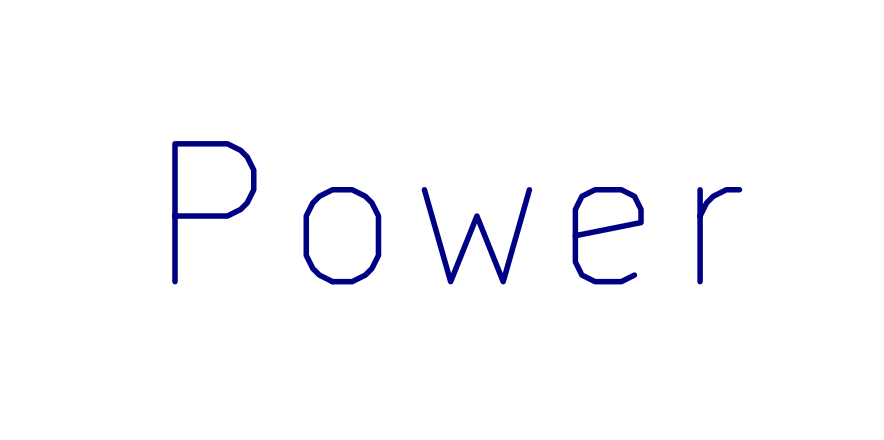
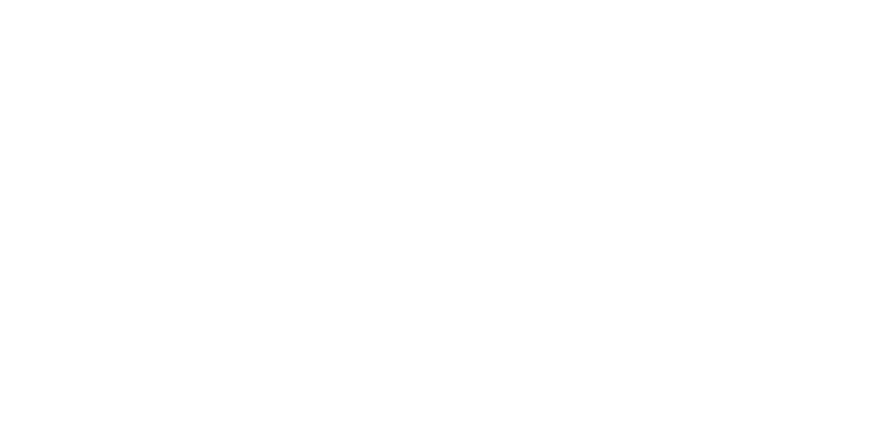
text: Power (457, 212) -> none

